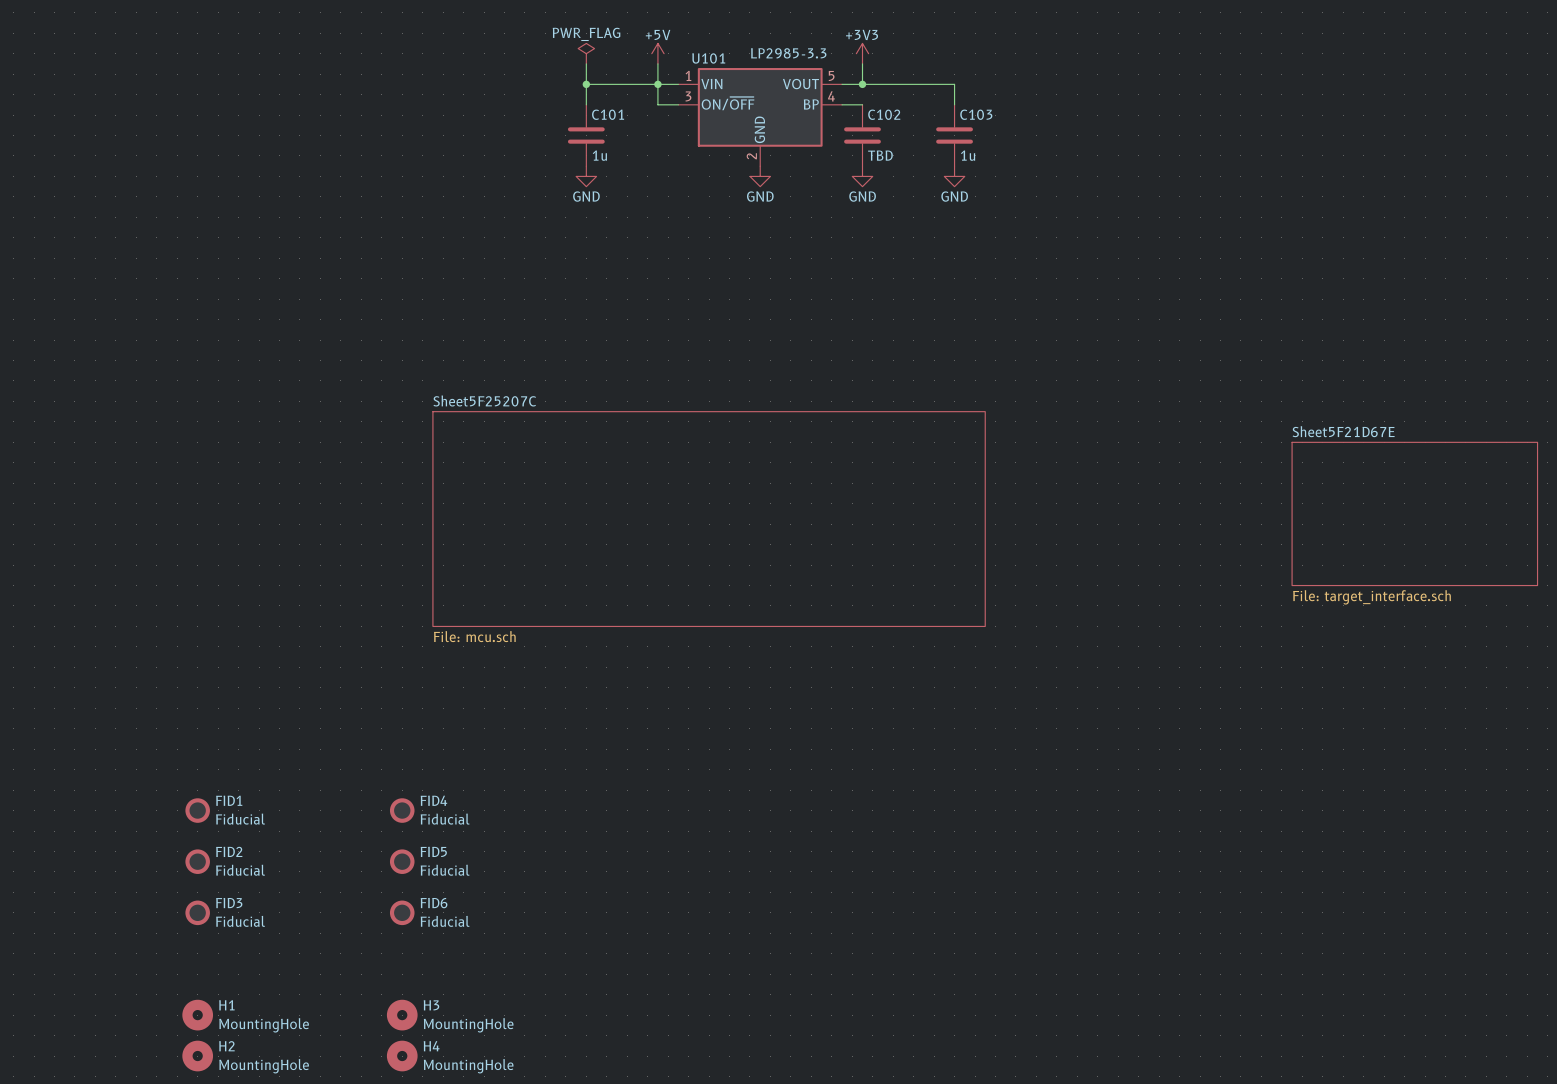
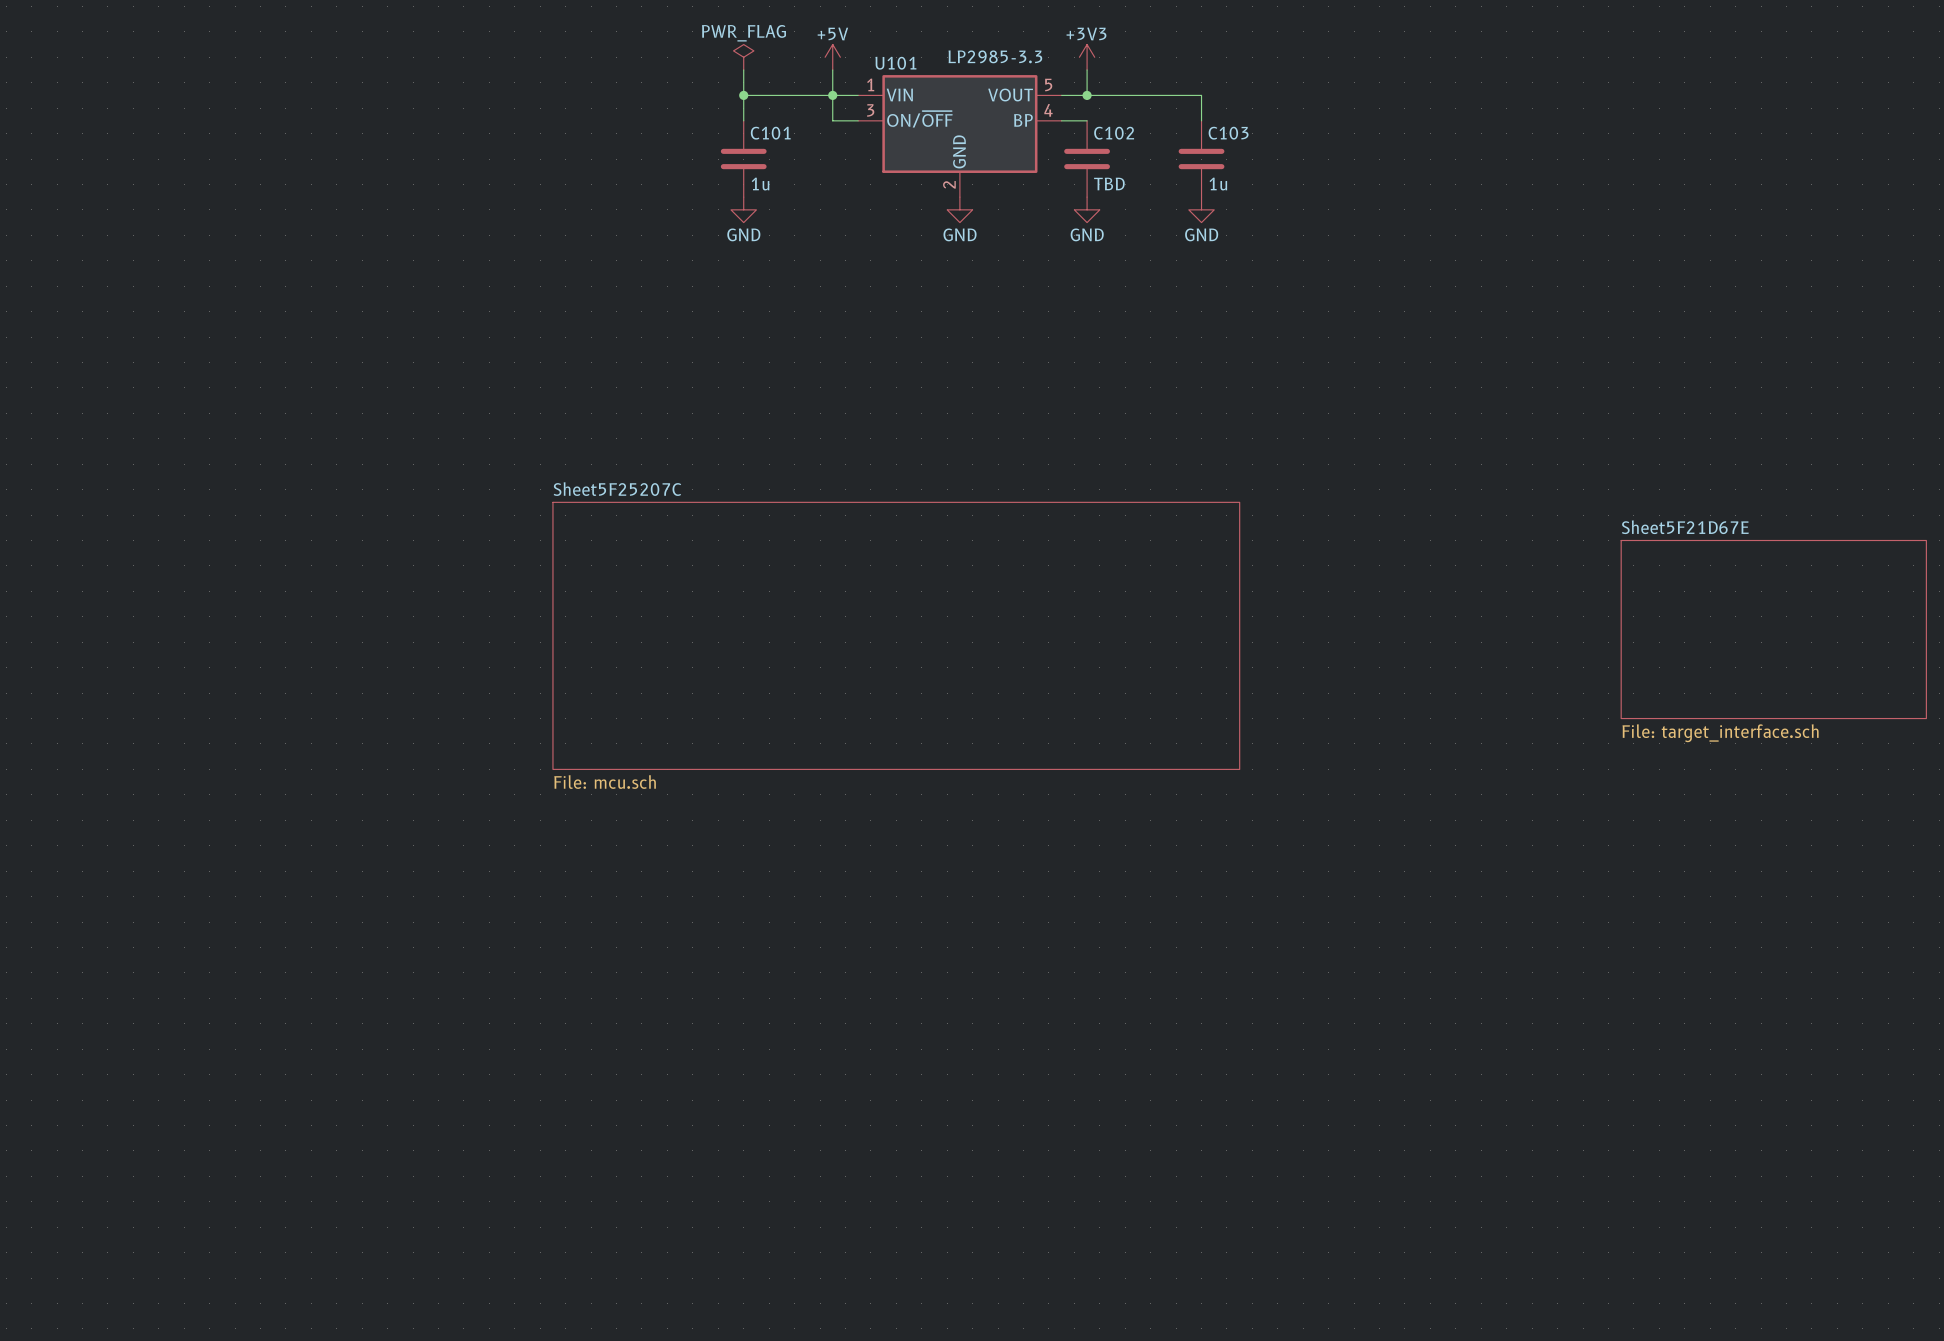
FID1: Fiducial (197, 810) -> none
FID4: Fiducial (402, 810) -> none
FID2: Fiducial (197, 861) -> none
FID5: Fiducial (402, 861) -> none
FID3: Fiducial (197, 912) -> none
FID6: Fiducial (402, 912) -> none
H1: MountingHole (197, 1015) -> none
H3: MountingHole (402, 1015) -> none
H2: MountingHole (197, 1056) -> none
H4: MountingHole (402, 1056) -> none

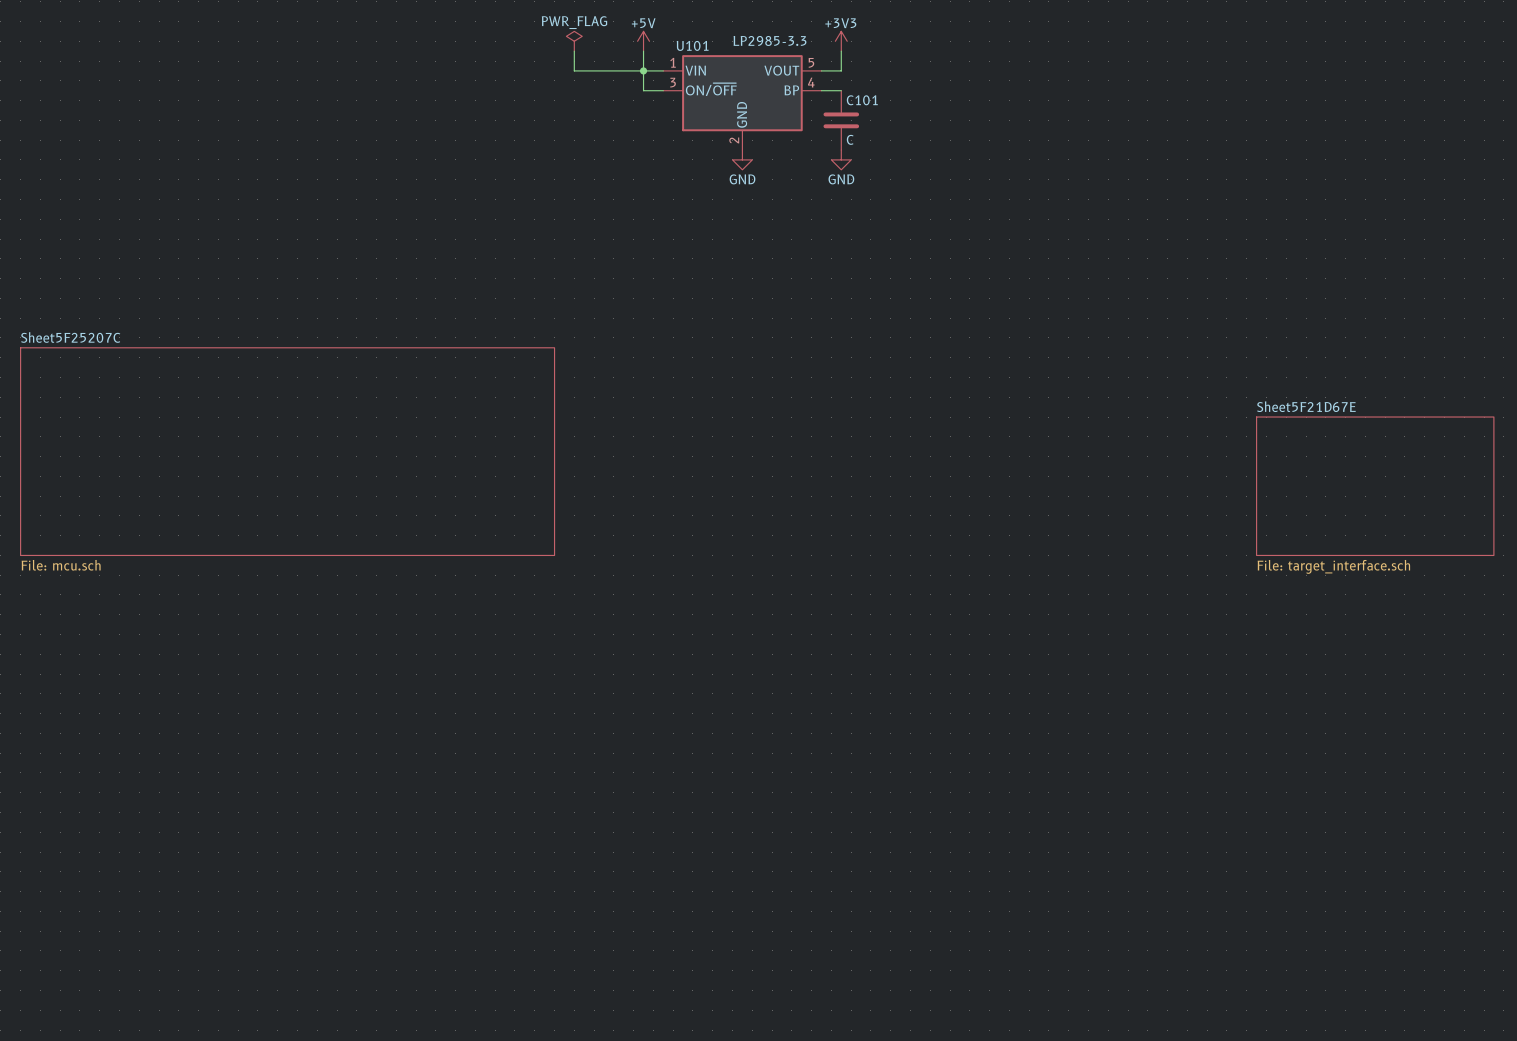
wire: (743, 95) (743, 120) -> none
junction: (743, 95) -> none
wire: (1087, 95) (1201, 95) (1201, 120) -> none
junction: (1087, 95) -> none
C102 name: C102 (1114, 133) -> C101 (862, 100)
C101: 1u (743, 159) -> none
C103: 1u (1201, 159) -> none
C102 value: TBD (1109, 183) -> C (850, 139)
power symbol: GND (743, 209) -> none
power symbol: GND (1201, 209) -> none
sheet Sheet5F25207C position: (896, 635) -> (287, 451)

